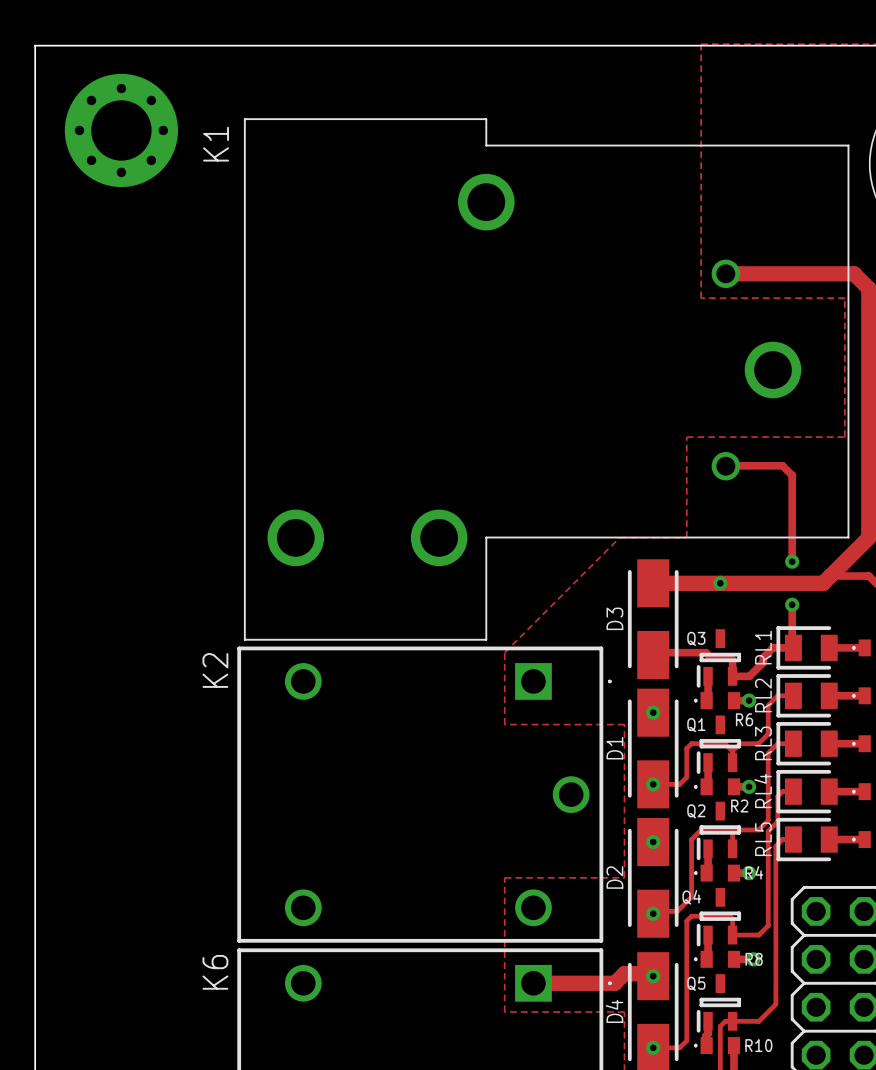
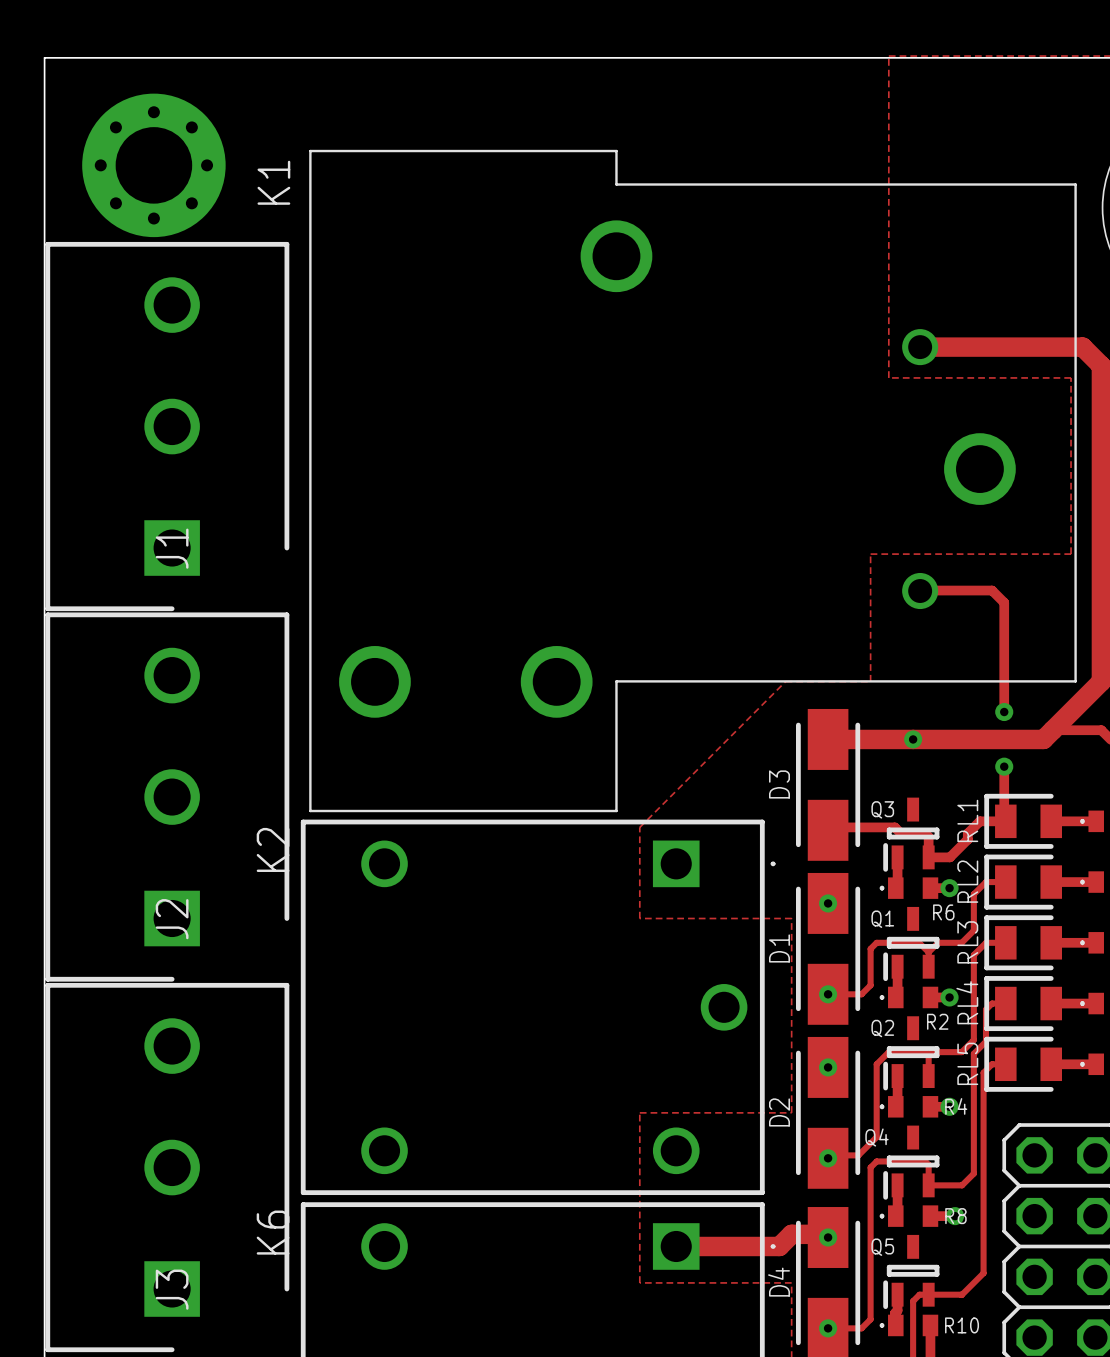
J1: none -> (167, 426)
J2: none -> (167, 797)
J3: none -> (167, 1167)

